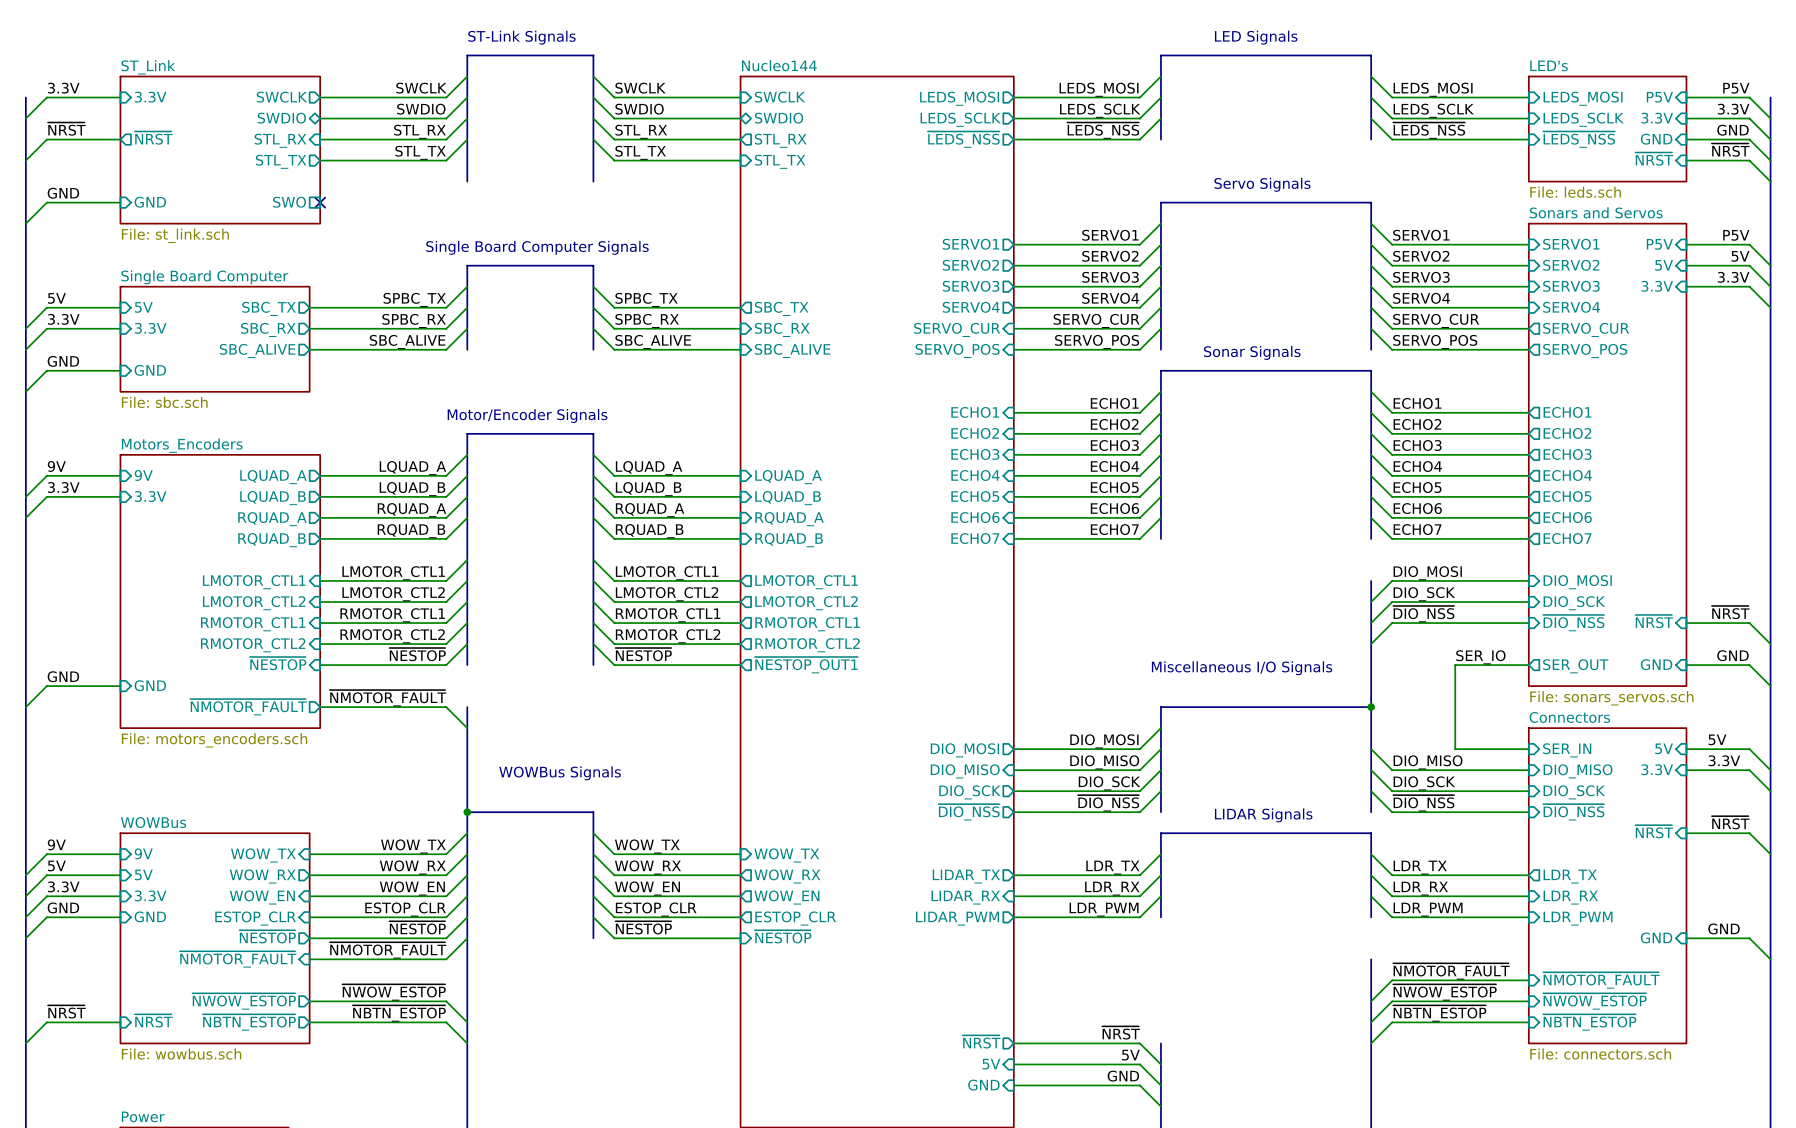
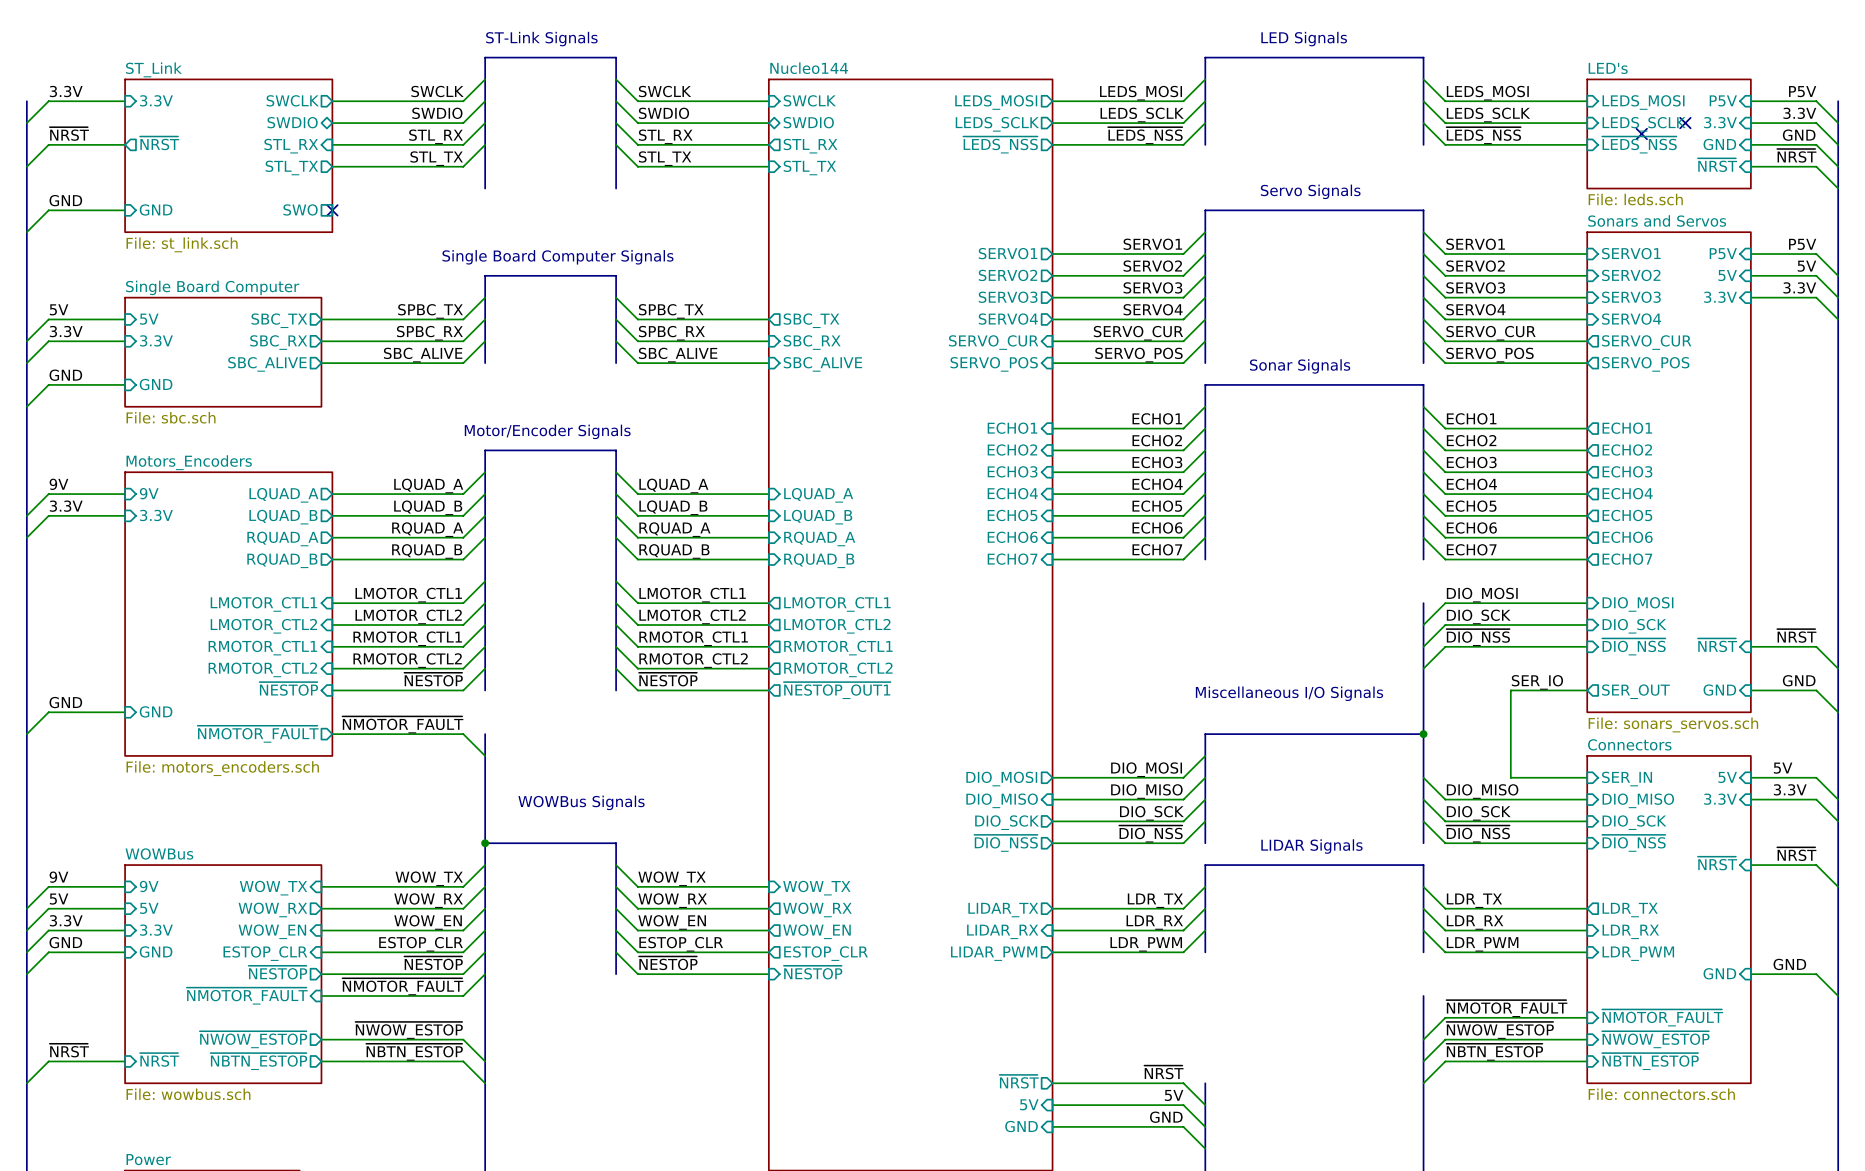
no-connect mark: none -> (1685, 123)
no-connect mark: none -> (1641, 133)

